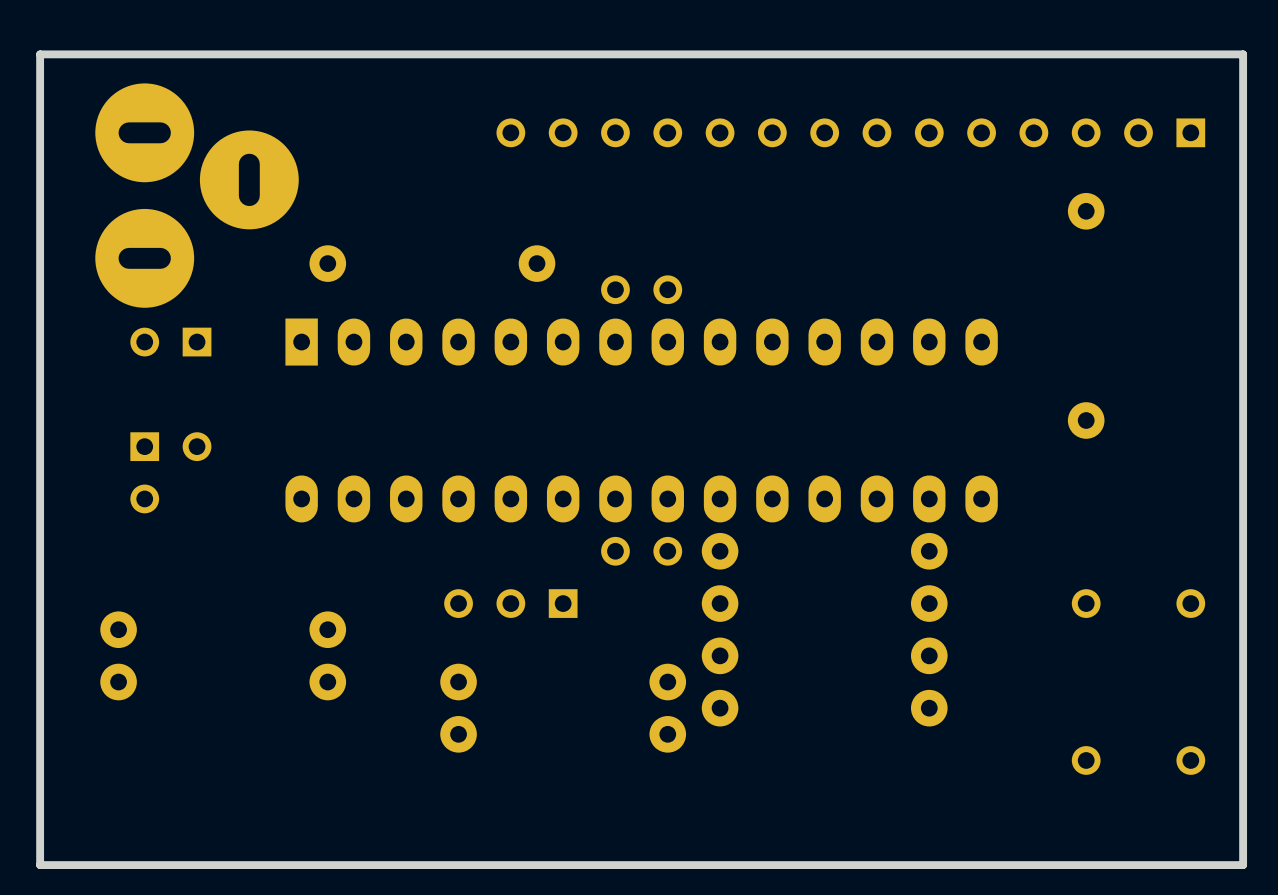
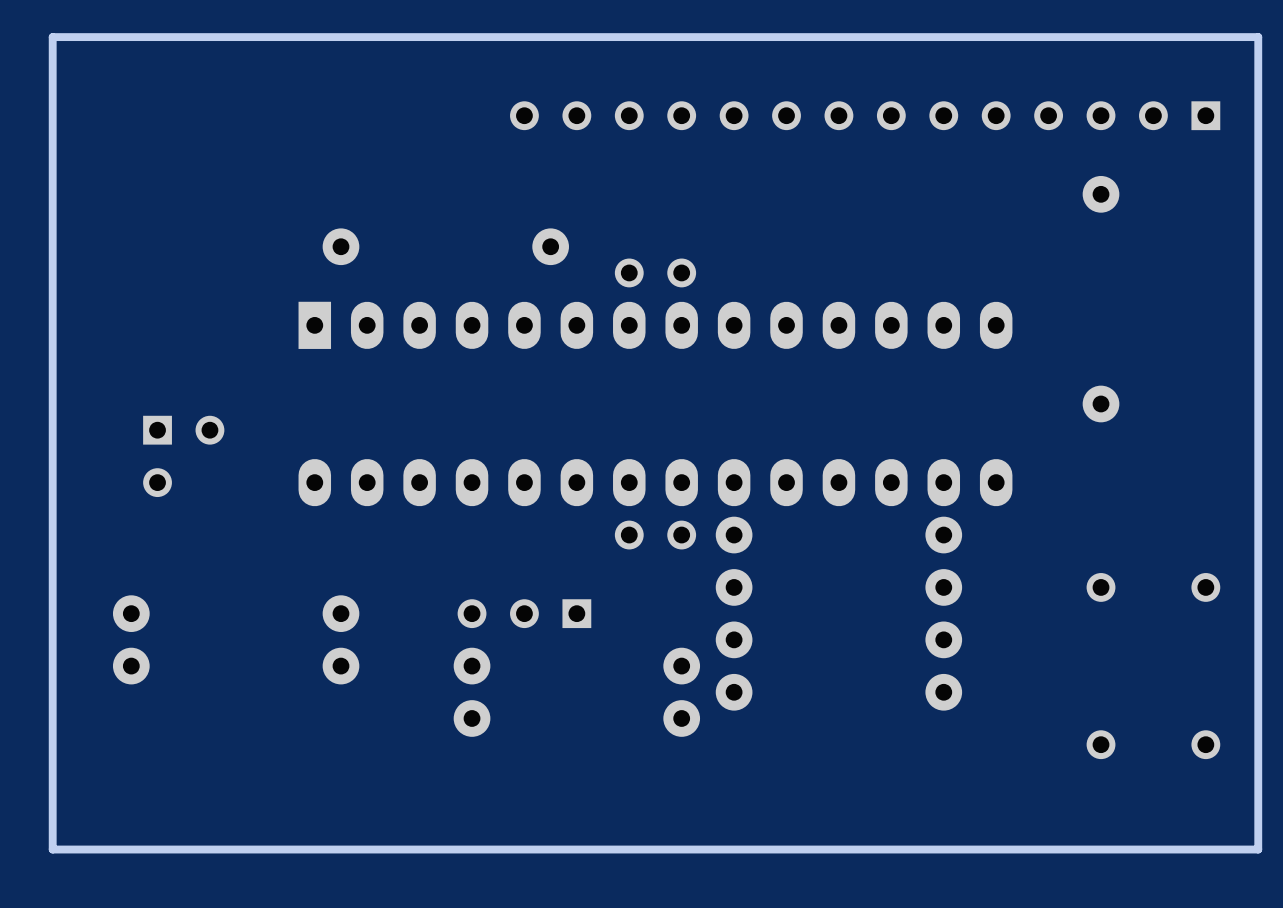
part: (197, 195) -> none
part: (170, 342) -> none
part position: (510, 603) -> (524, 613)

